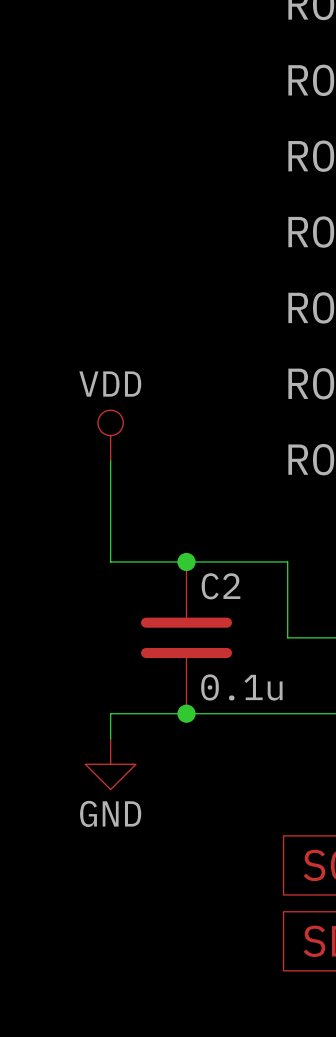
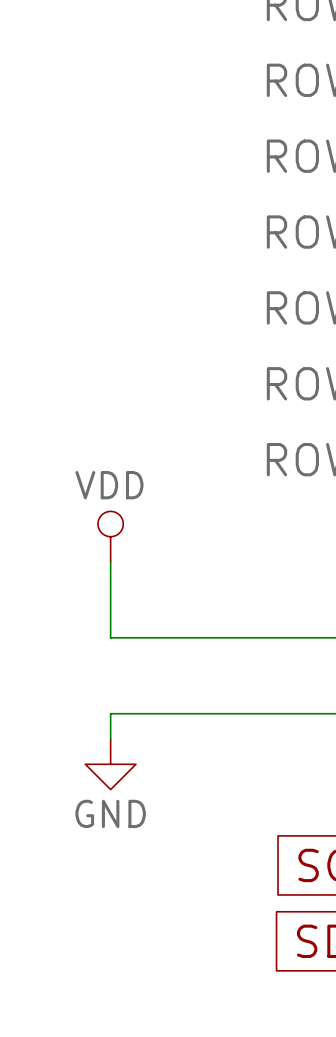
power symbol position: VDD (110, 435) -> VDD (110, 536)
wire: (110, 460) (110, 561) (287, 561) (287, 637) -> (110, 561) (110, 637) (287, 637)
junction: (186, 561) -> none
C2: 0.1u (186, 637) -> none
junction: (186, 713) -> none

